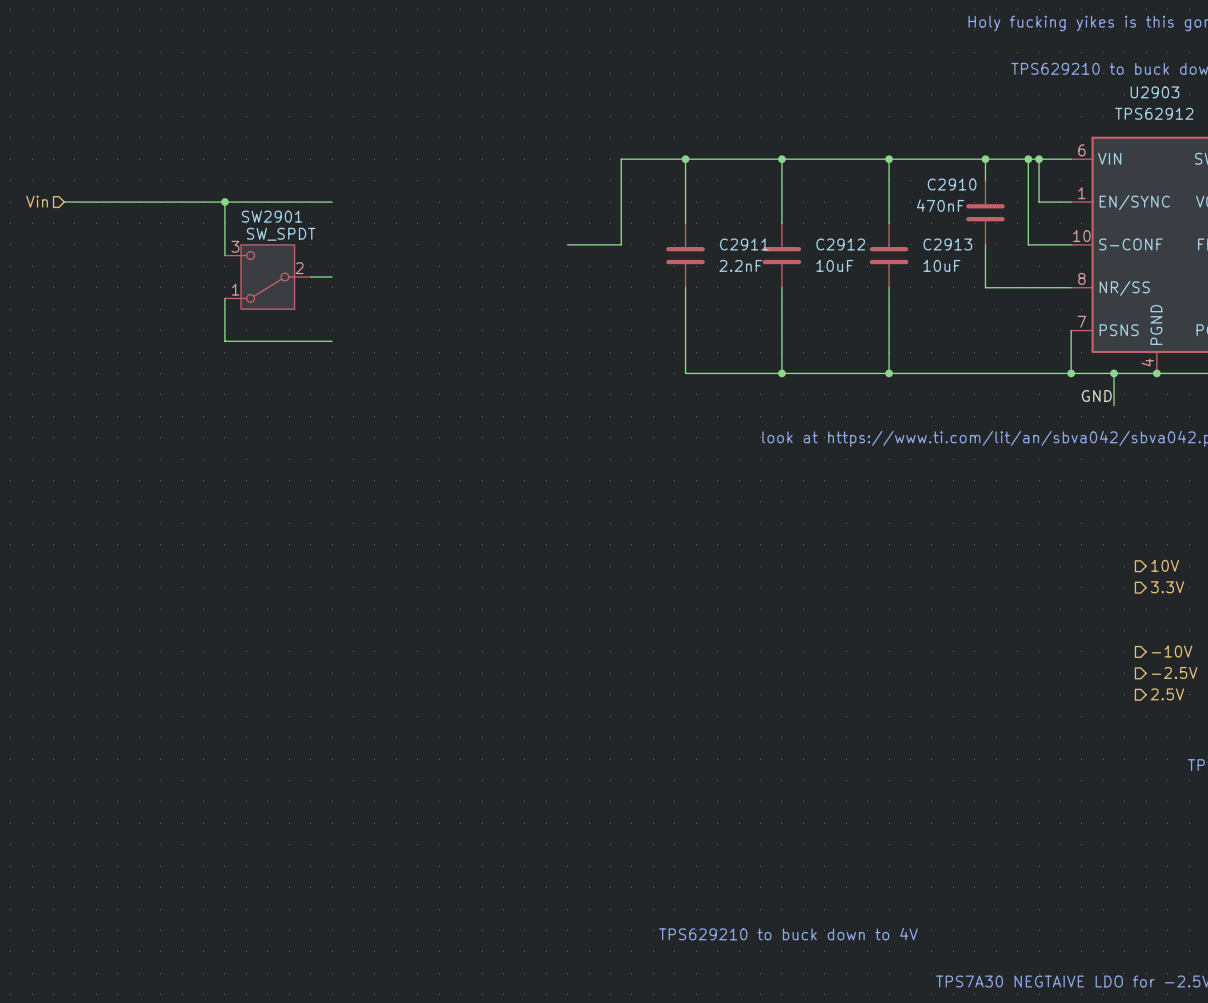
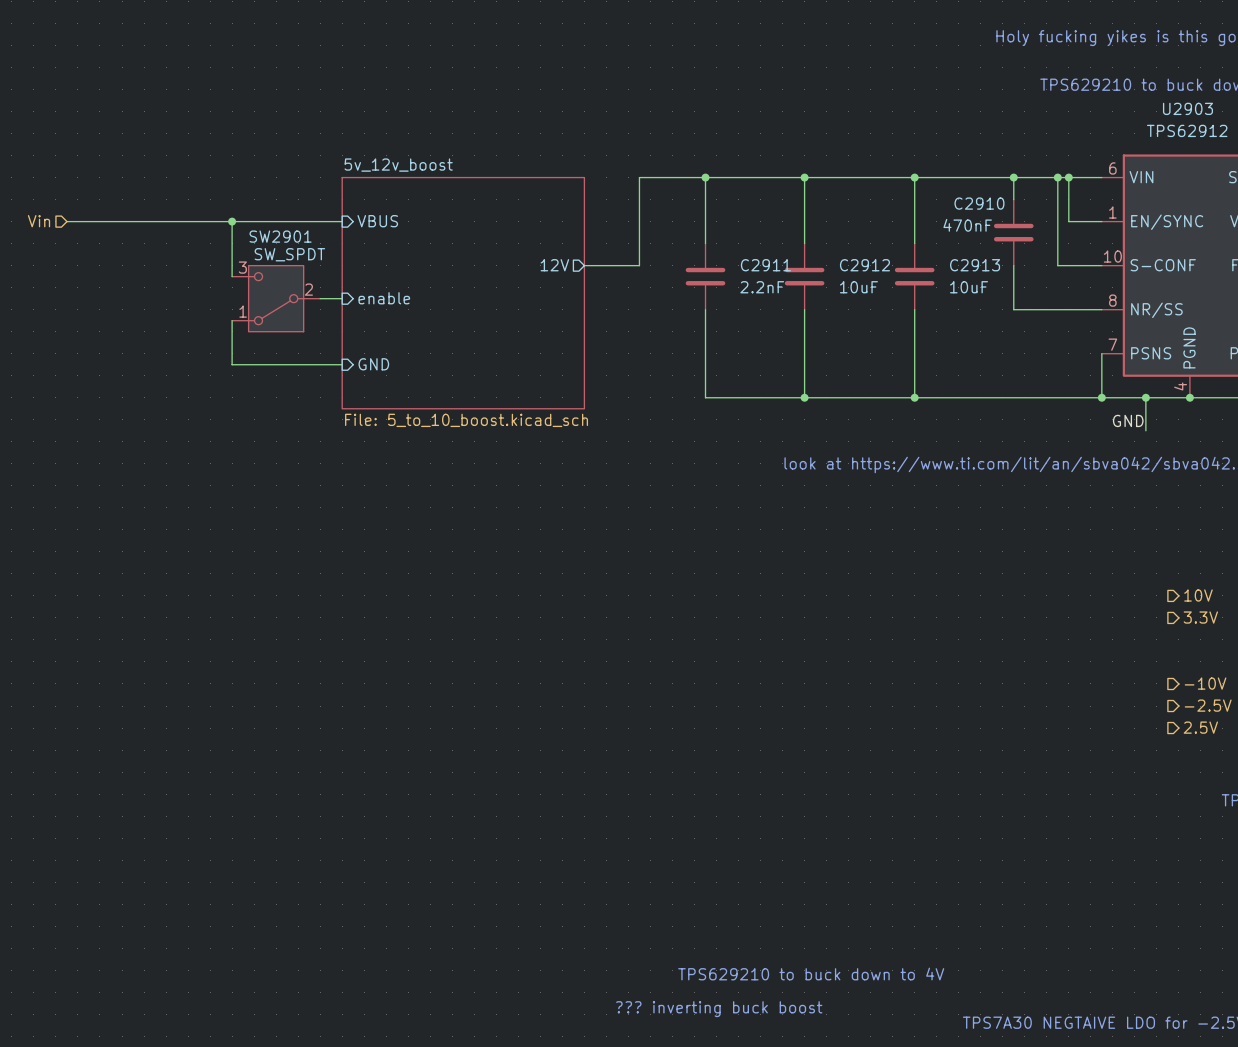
sheet pin: none -> VBUS (377, 221)
sheet pin: none -> 12V (554, 265)
sheet 5v_12v_boost: none -> File: 5_to_10_boost.kicad_sch (463, 293)
sheet pin: none -> enable (384, 298)
sheet pin: none -> GND (373, 364)
text: none -> ??? inverting buck boost (719, 1009)

